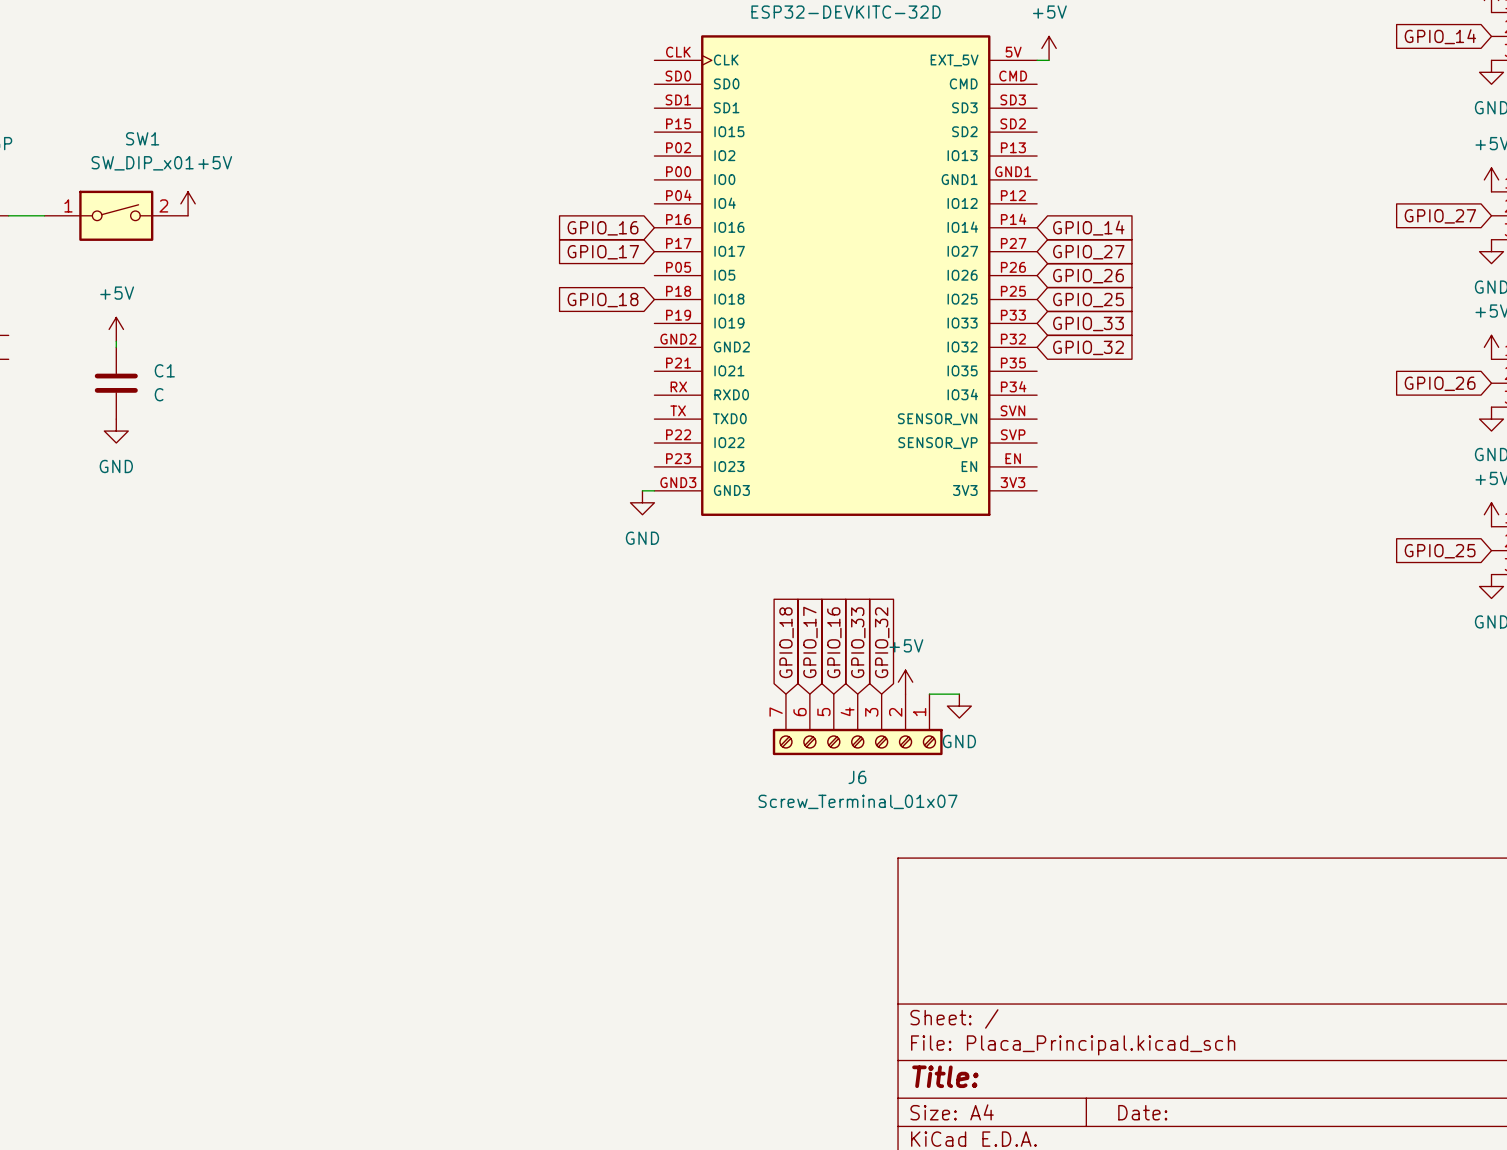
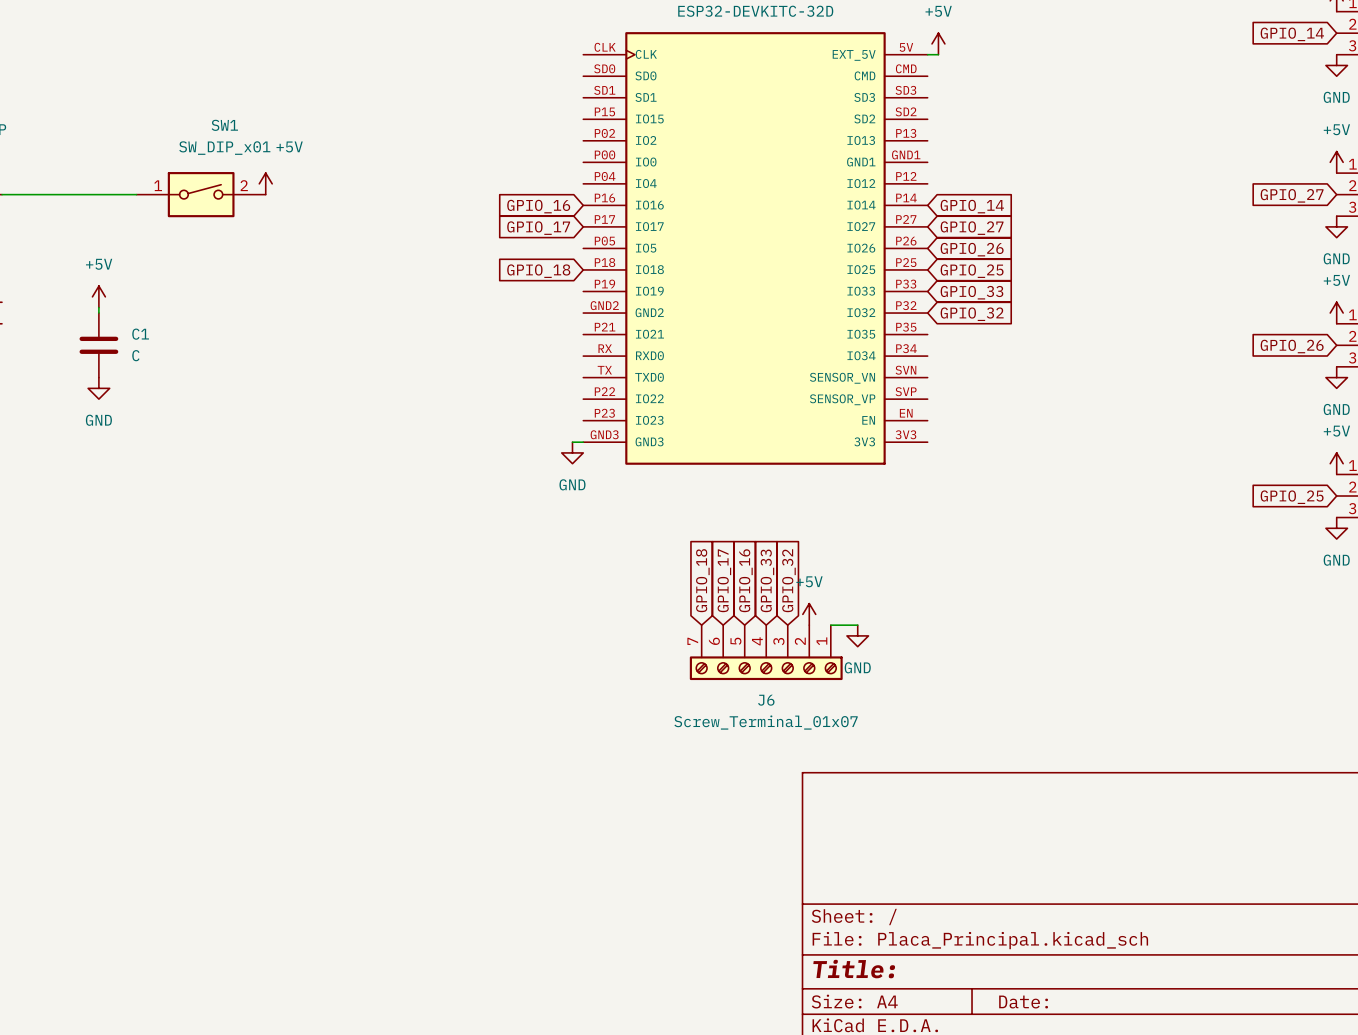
power symbol position: +5V (188, 203) -> +5V (265, 183)
SW1 position: (116, 215) -> (201, 194)

